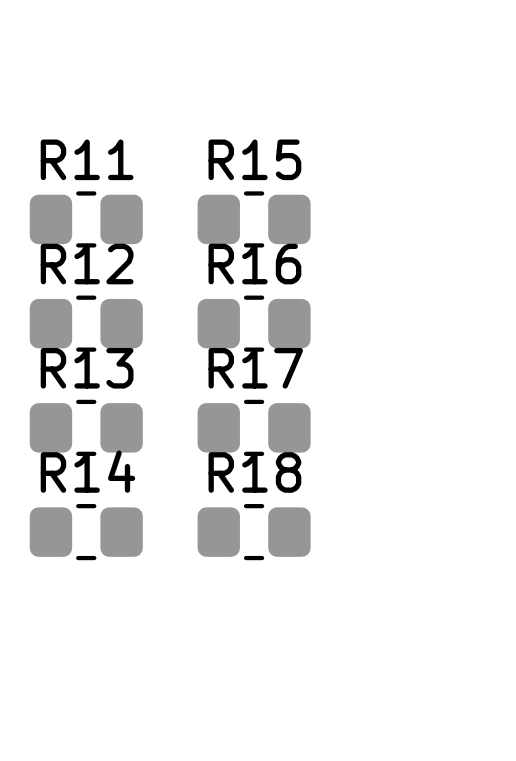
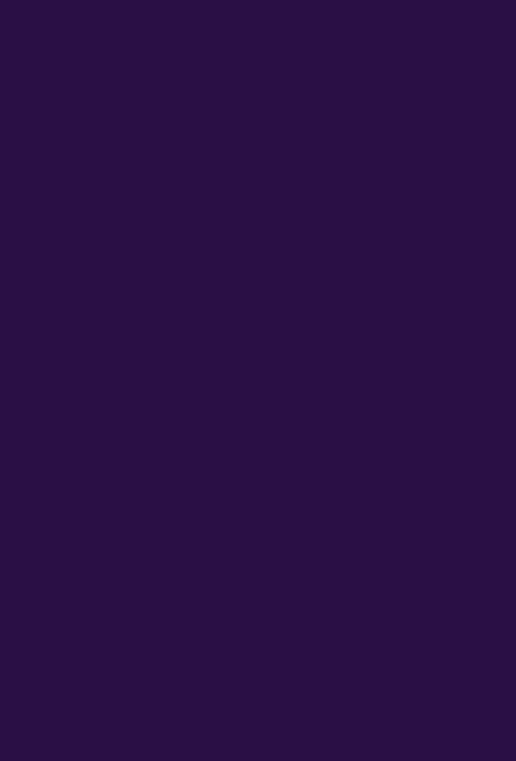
R11: (86, 219) -> none
R15: (254, 219) -> none
R12: (86, 323) -> none
R16: (254, 323) -> none
R13: (86, 427) -> none
R17: (254, 427) -> none
R14: (86, 532) -> none
R18: (254, 532) -> none

